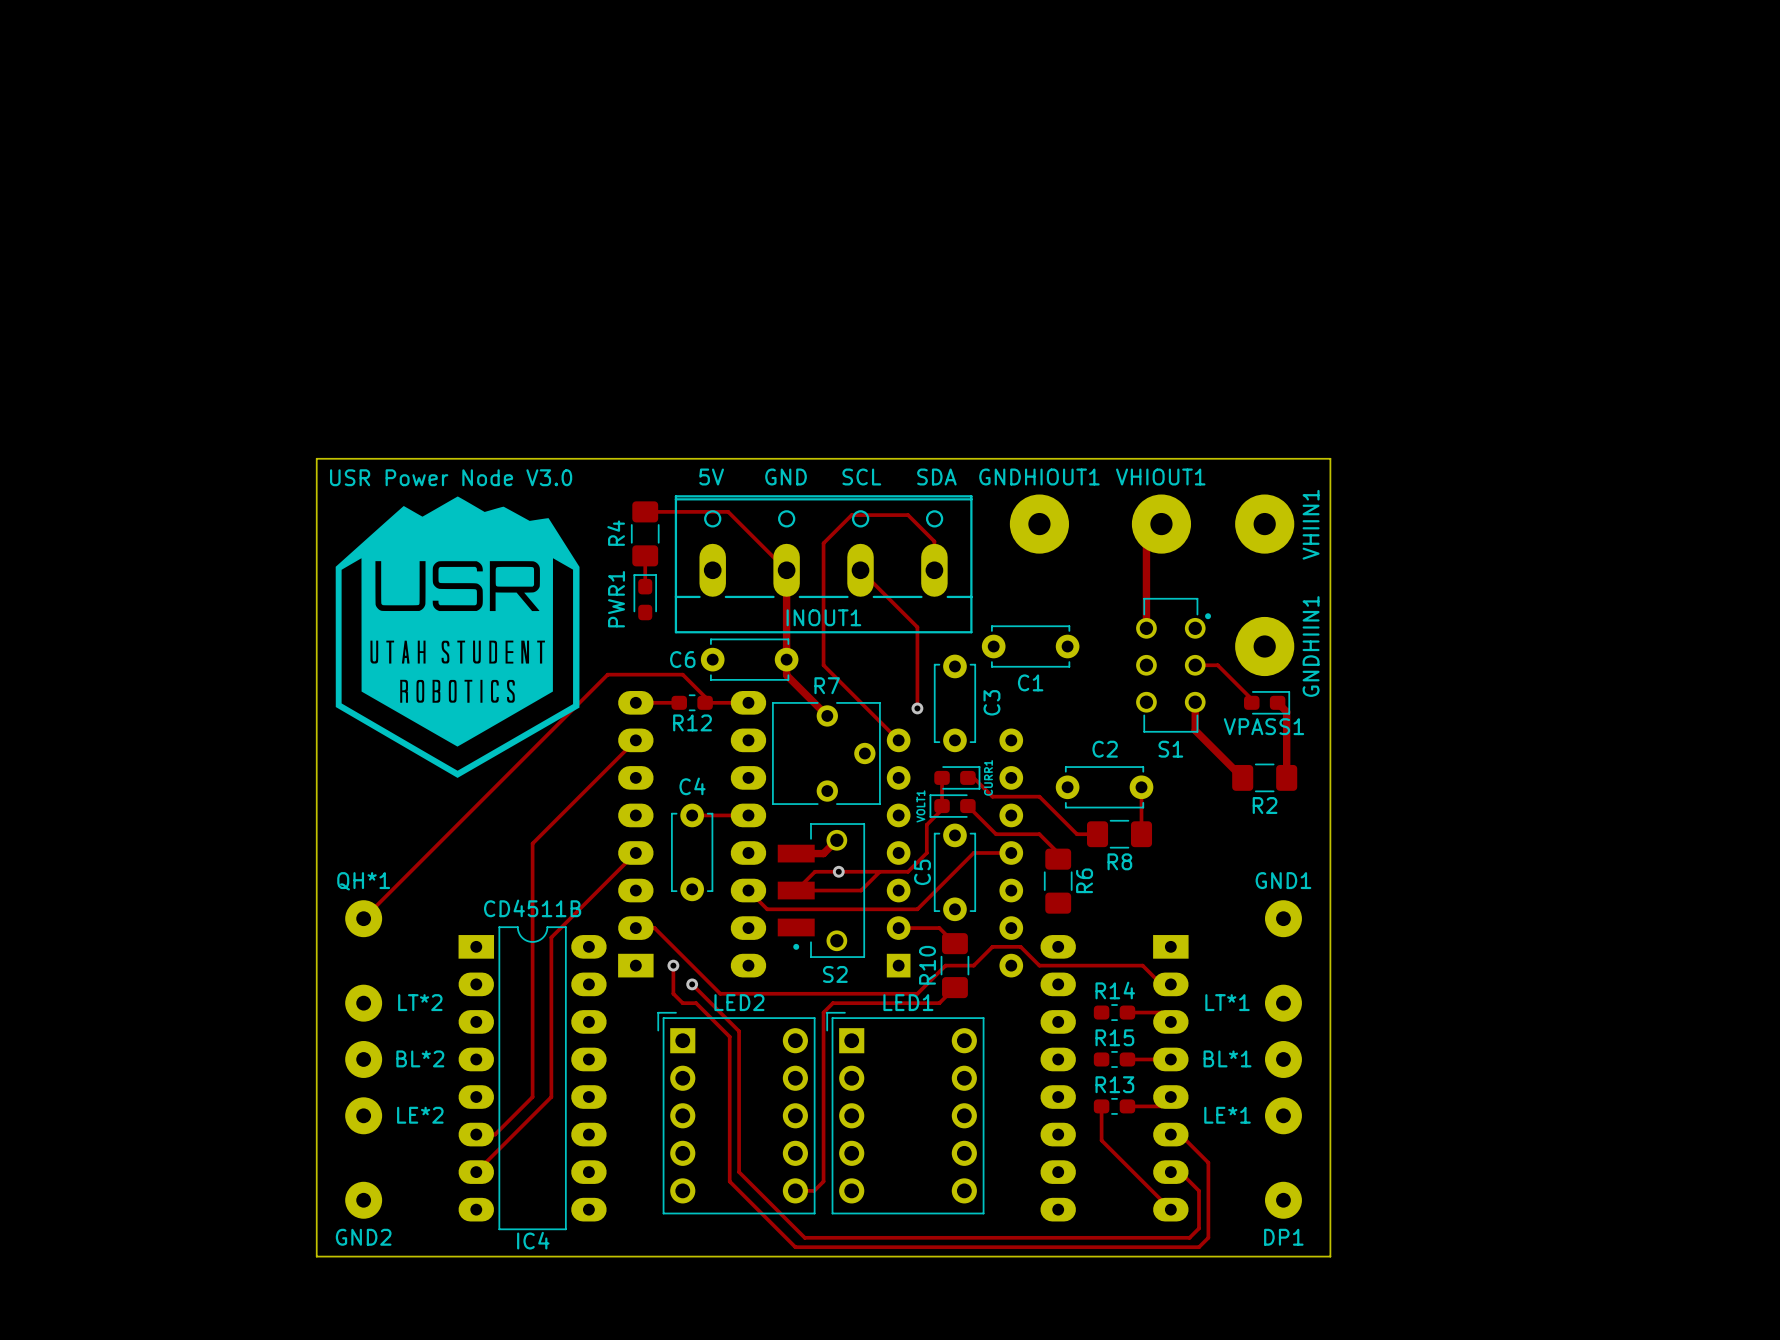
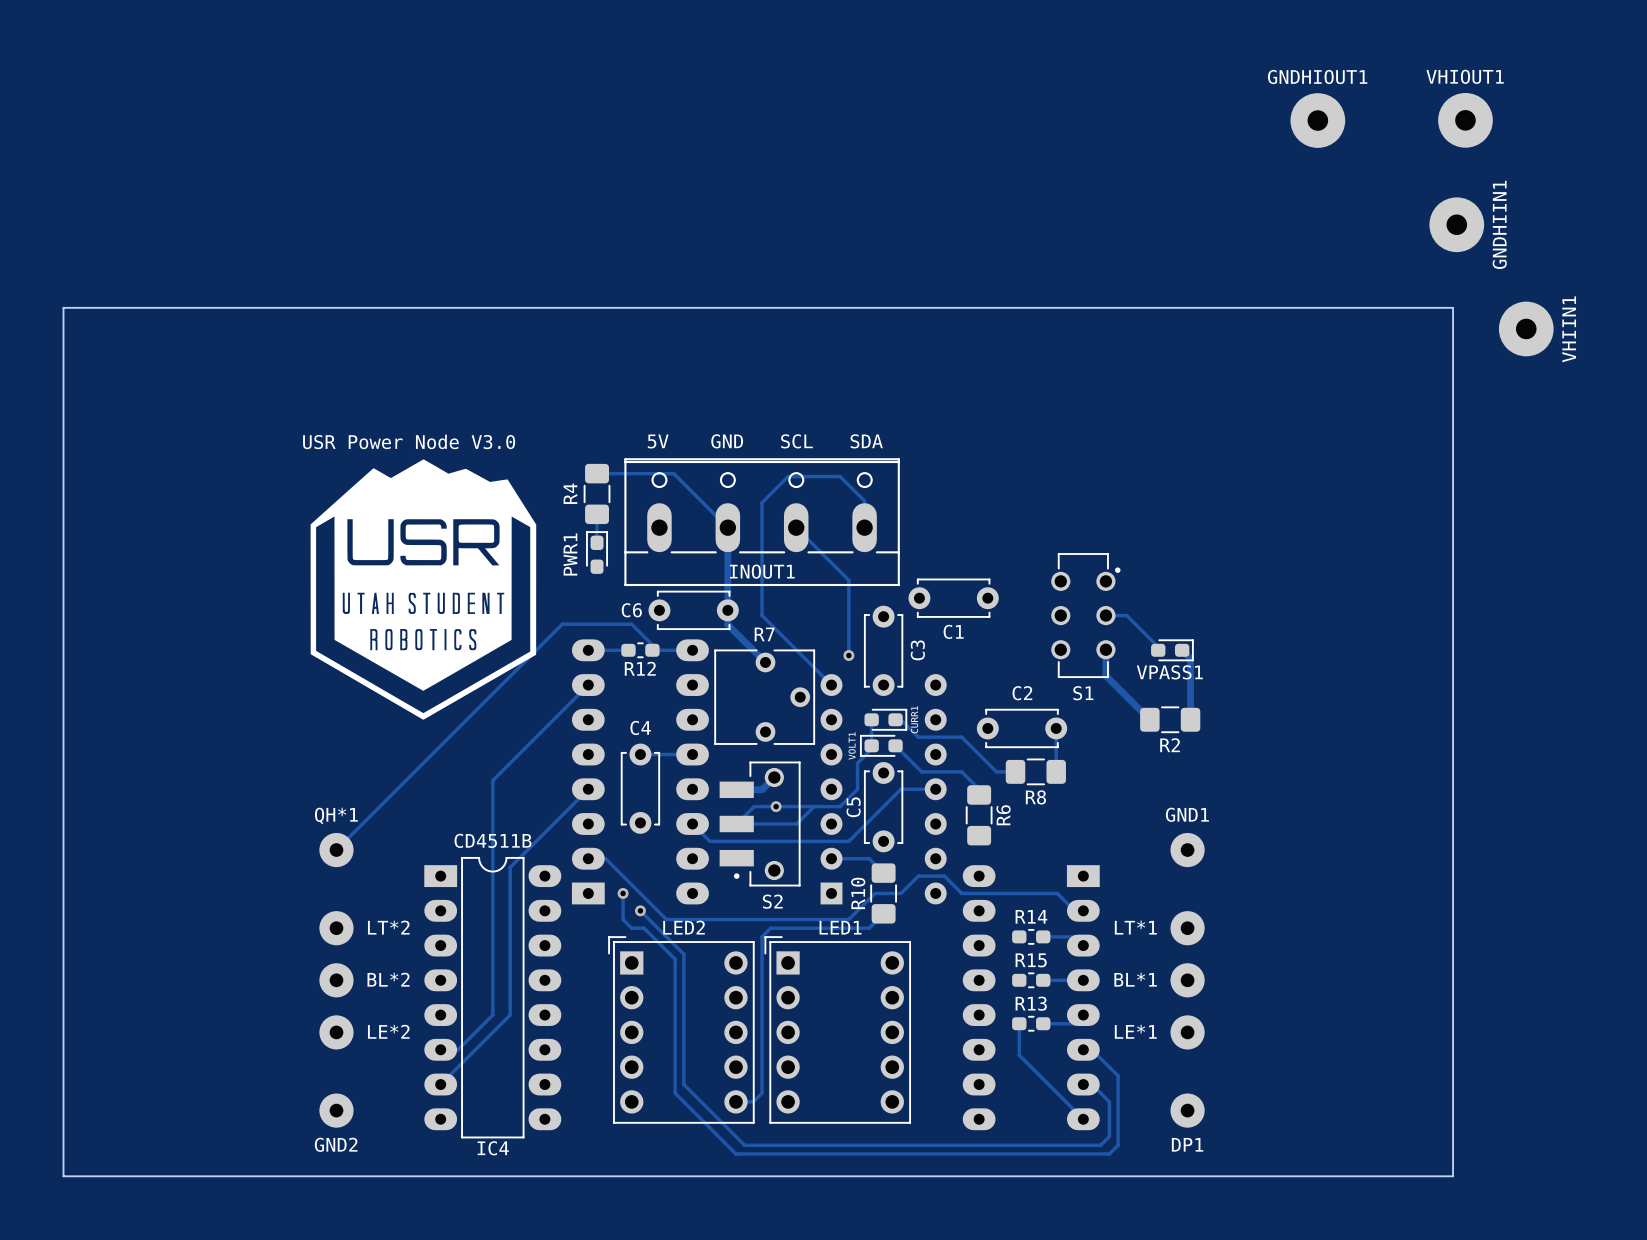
board edge: (316, 458) (1330, 458) (1330, 1256) (316, 1256) (316, 458) -> (63, 307) (63, 1176) (1453, 1176) (1453, 307) (63, 307)
GNDHIOUT1 position: (1039, 524) -> (1317, 120)
track: (1161, 524) (1146, 539) (1146, 628) -> none
VHIOUT1 position: (1161, 524) -> (1465, 120)
VHIIN1 position: (1264, 524) -> (1526, 328)
GNDHIIN1 position: (1264, 646) -> (1456, 224)

